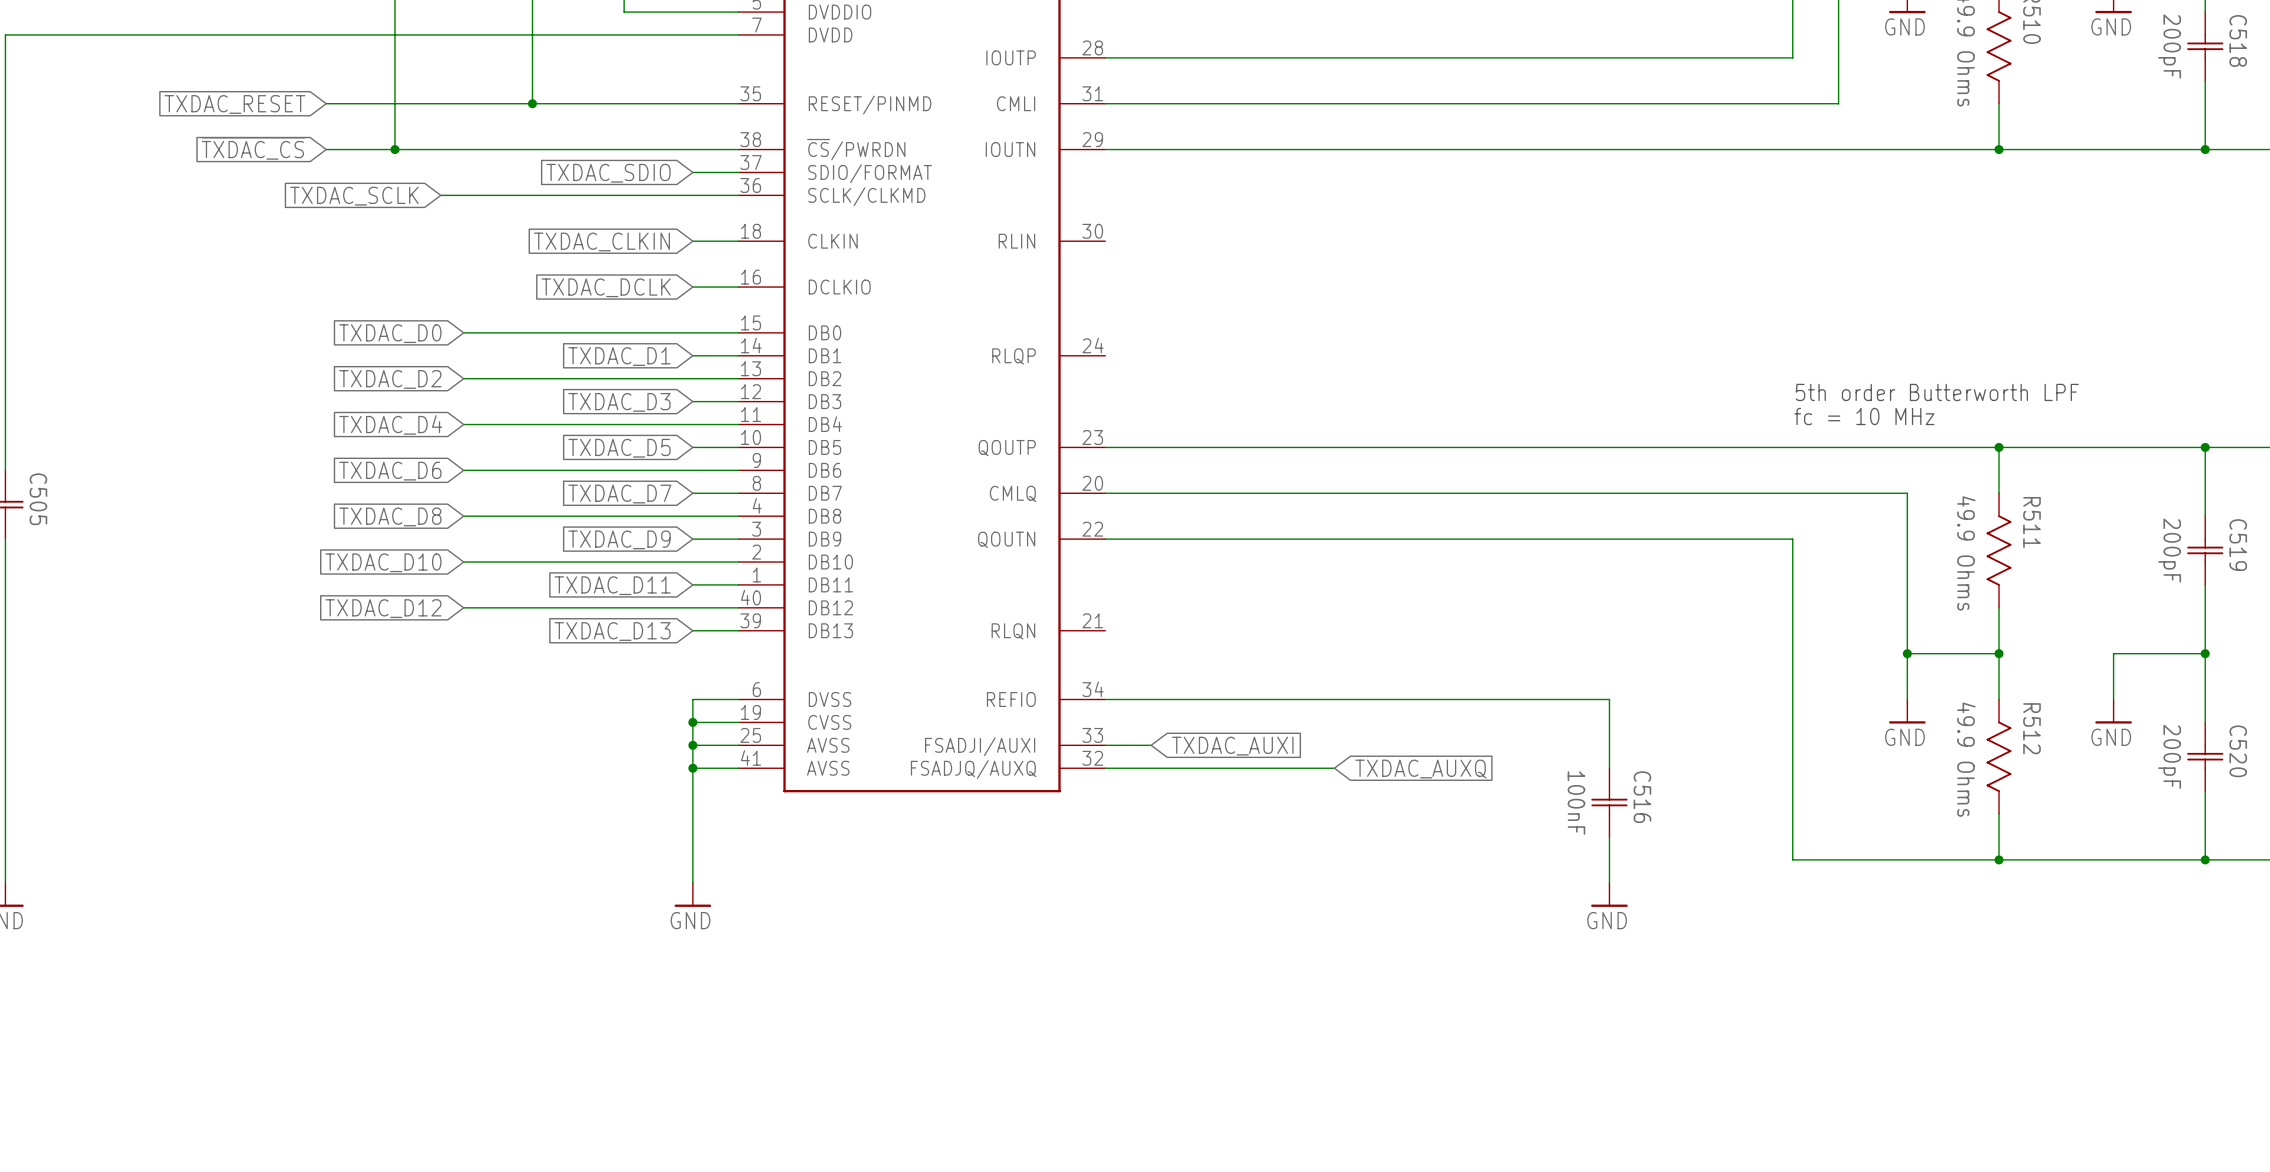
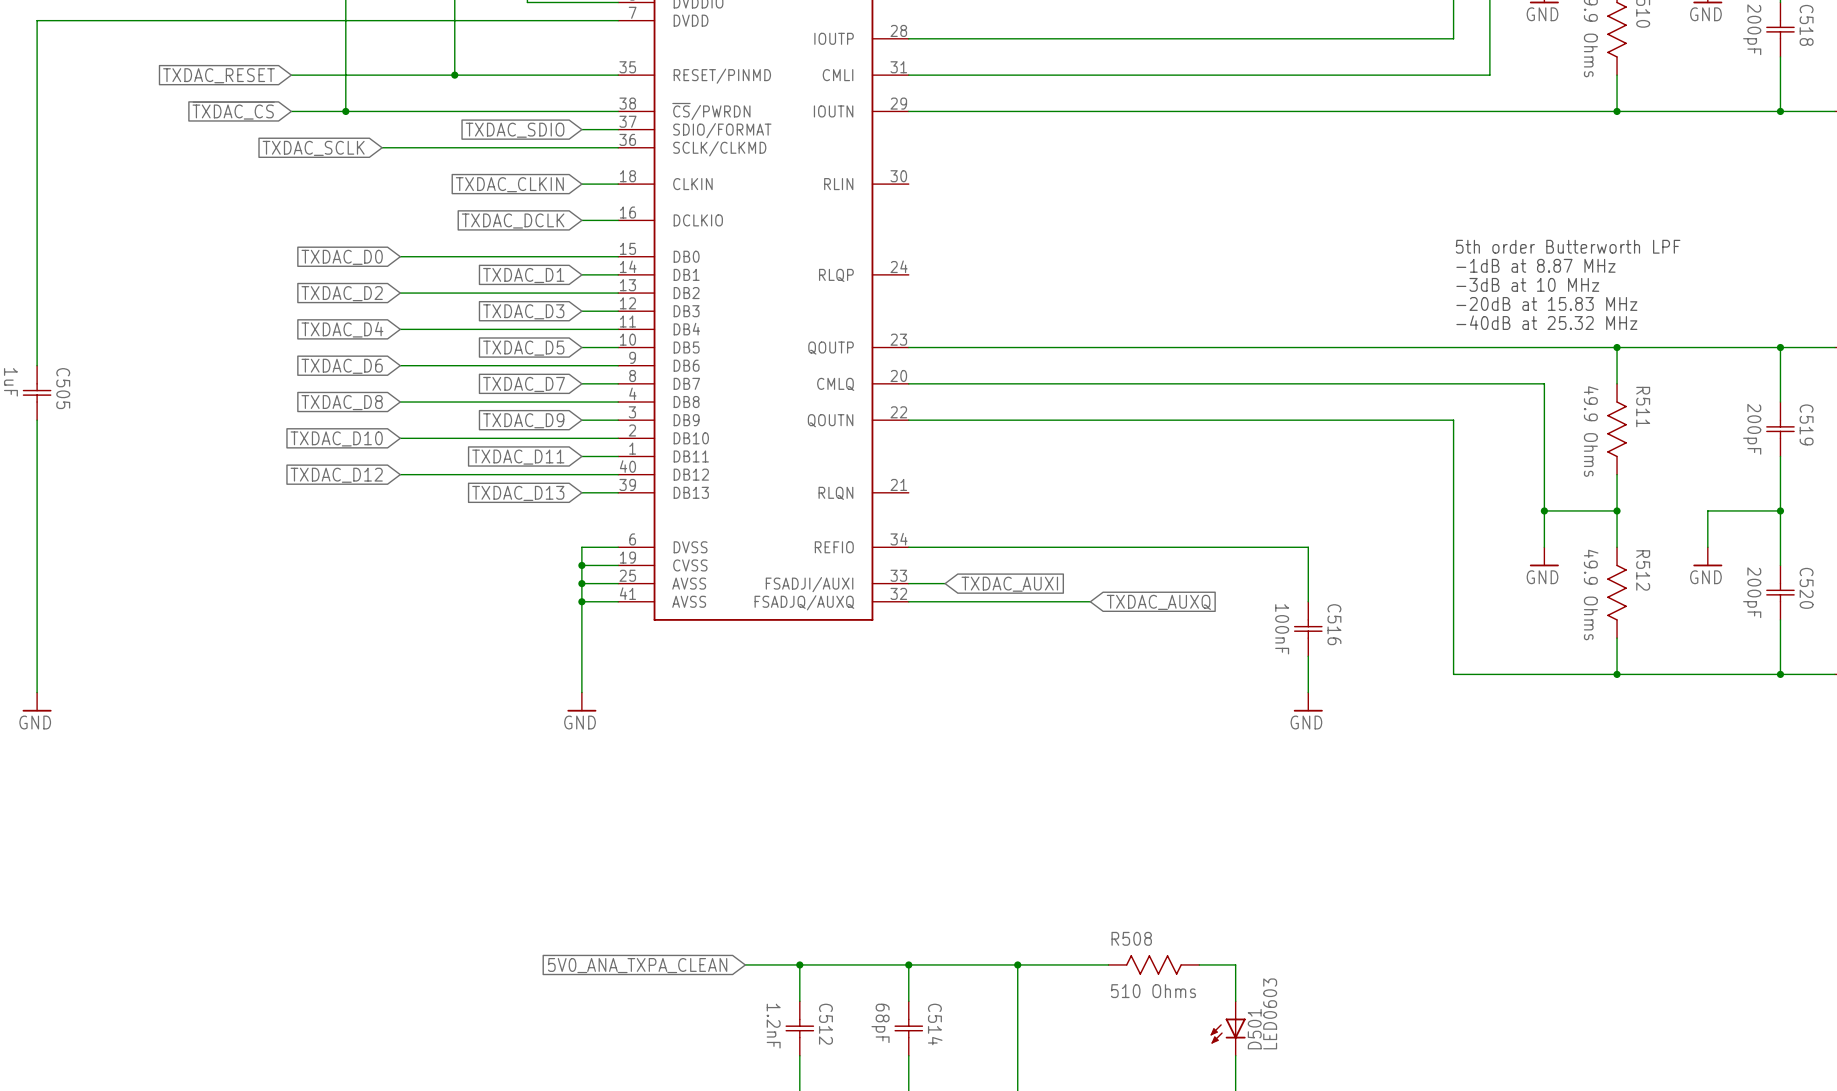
text: none -> 5th order Butterworth LPF (1568, 246)
text: none -> -1dB at 8.87 MHz (1535, 265)
text: none -> -3dB at 10 MHz (1527, 284)
text: 5th order Butterworth LPF (1937, 392) -> -20dB at 15.83 MHz (1546, 303)
text: fc = 10 MHz (1864, 416) -> -40dB at 25.32 MHz (1546, 322)

